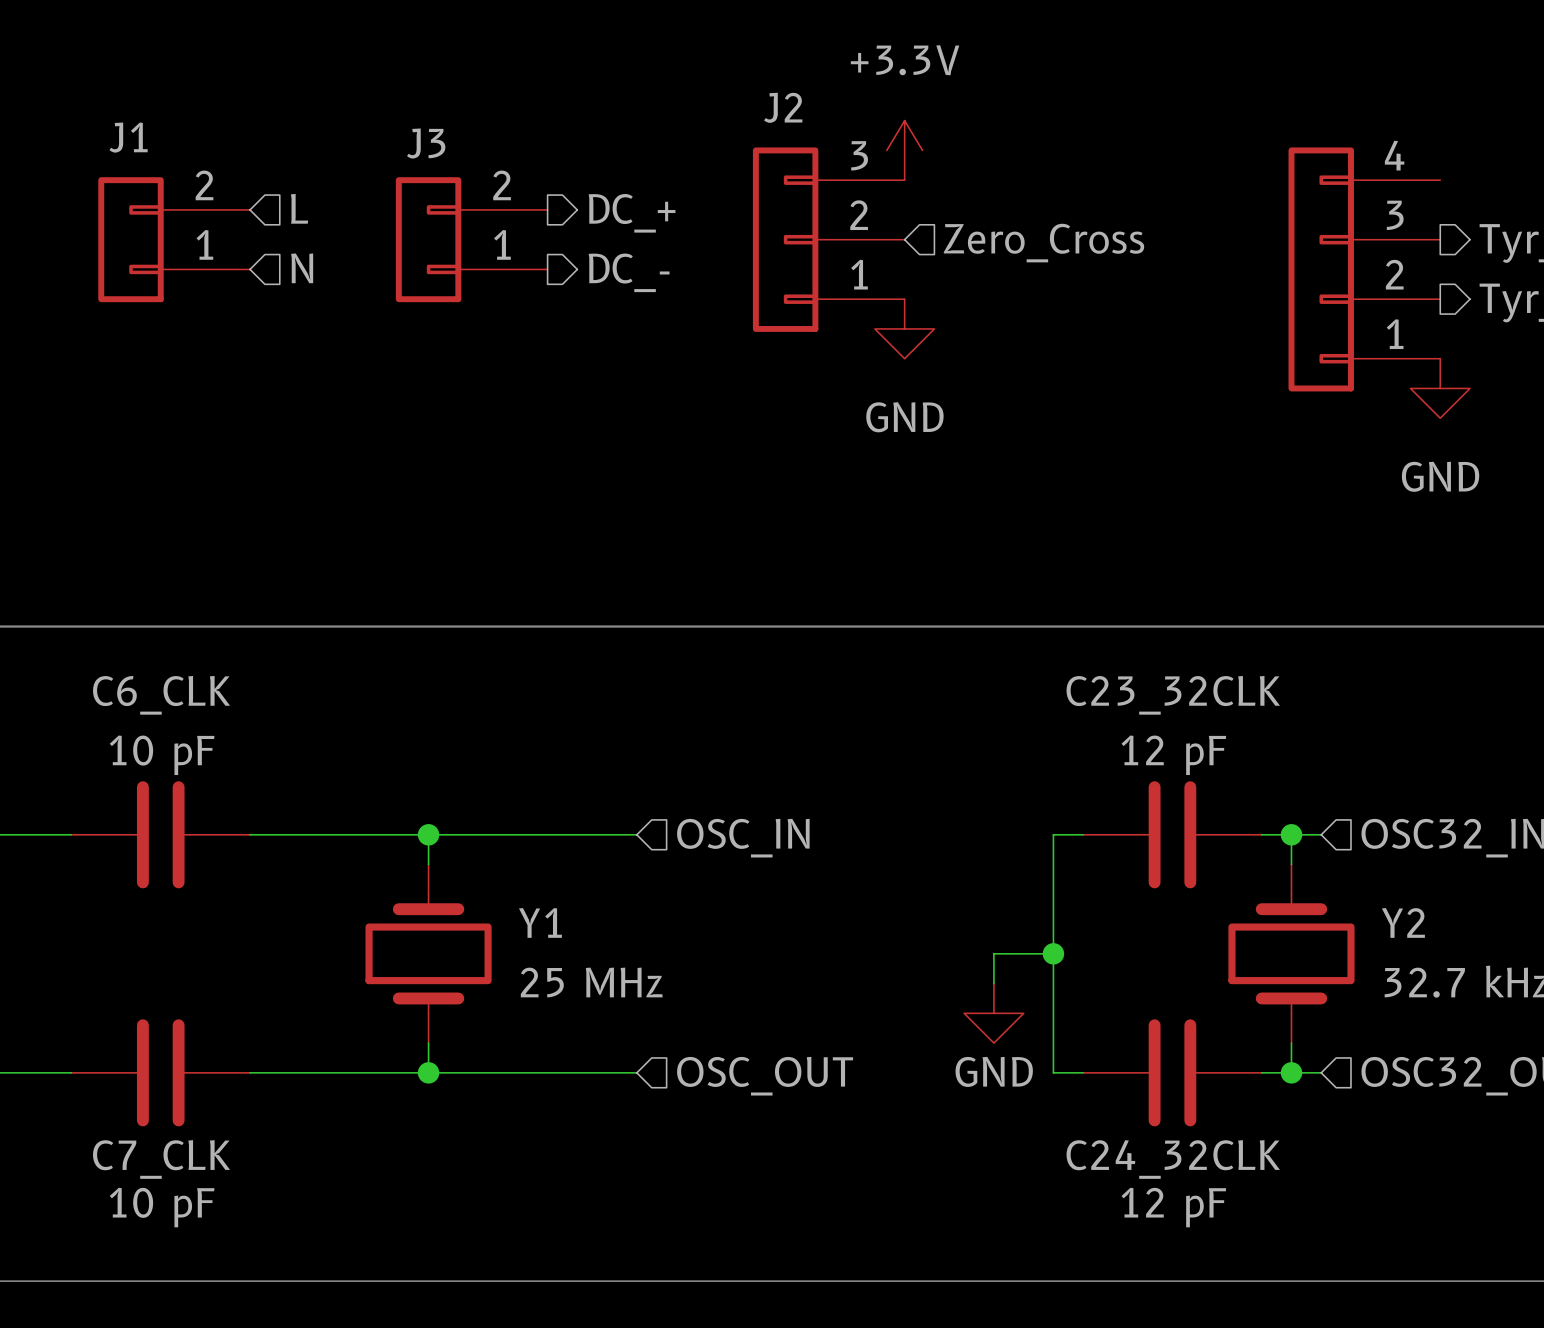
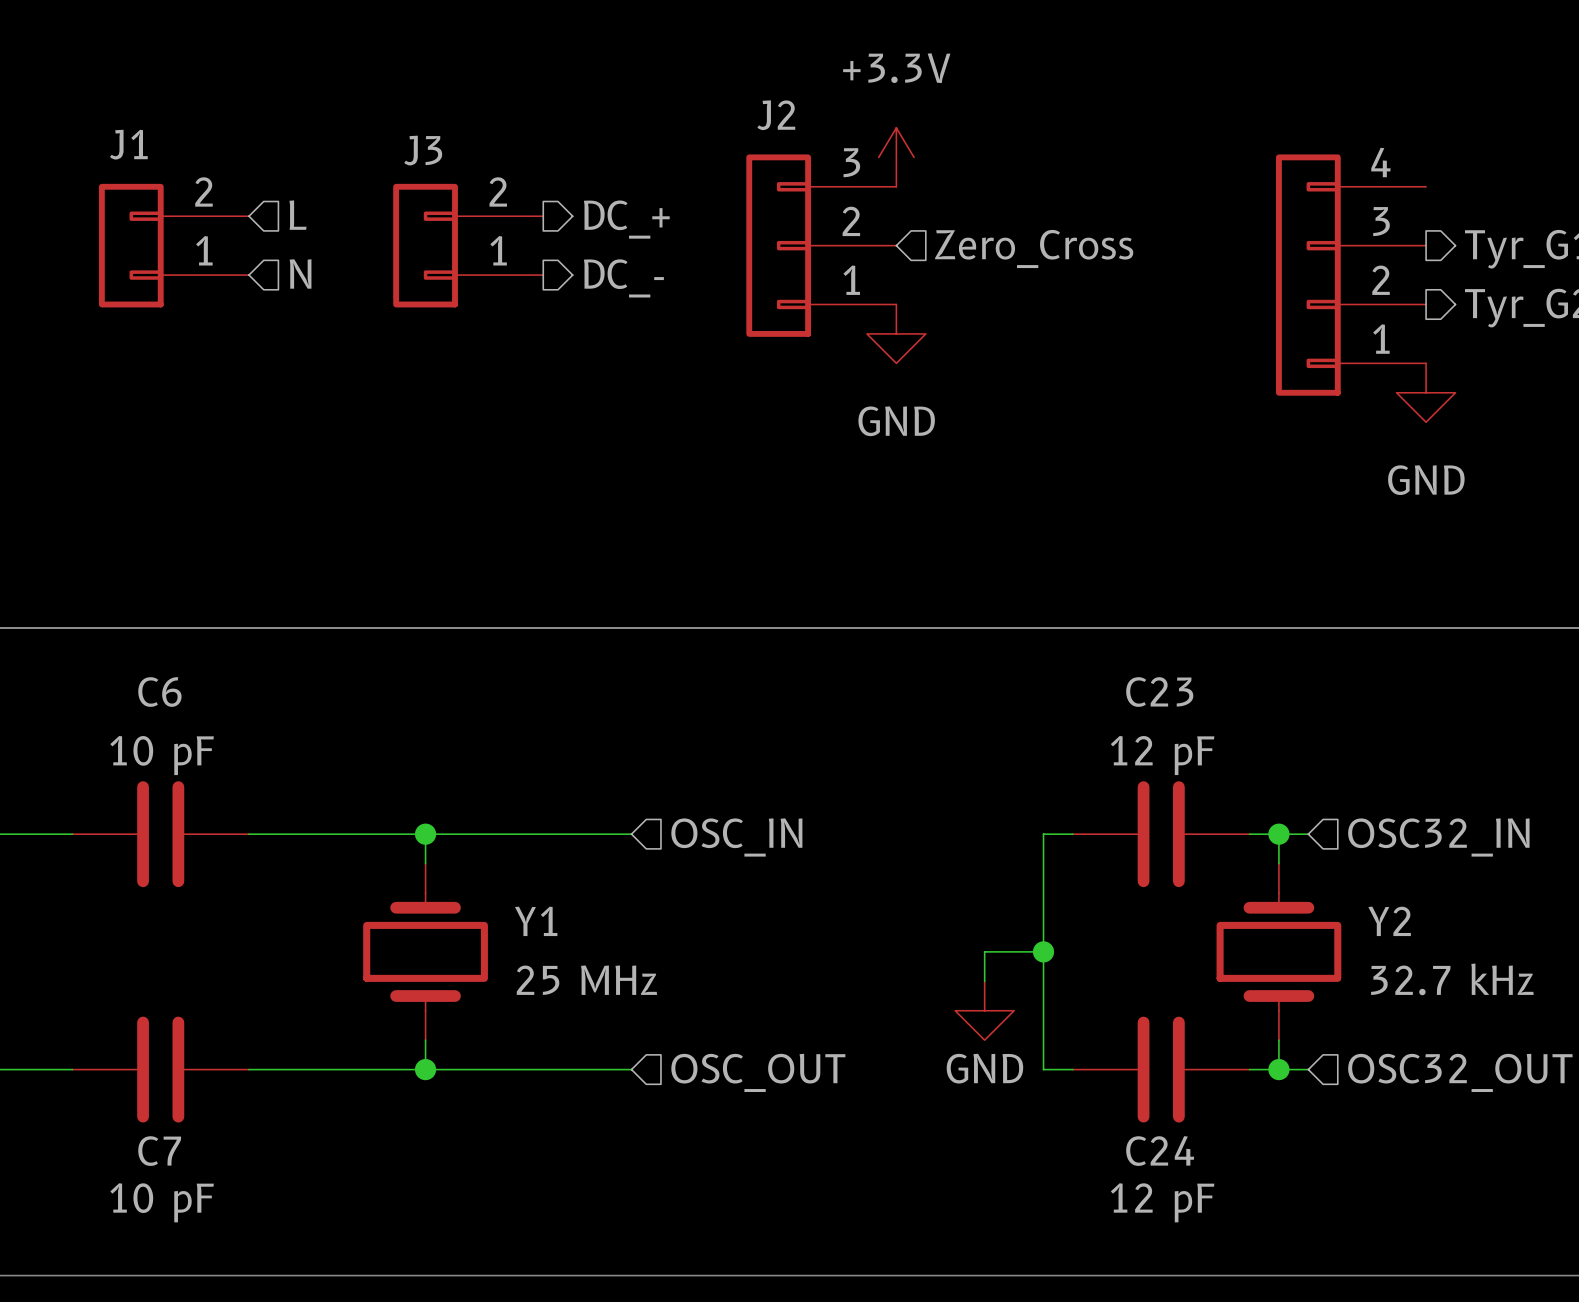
C6_CLK name: C6_CLK (161, 695) -> C6 (159, 692)
C23_32CLK name: C23_32CLK (1173, 695) -> C23 (1159, 692)
C7_CLK name: C7_CLK (161, 1159) -> C7 (159, 1151)
C24_32CLK name: C24_32CLK (1173, 1159) -> C24 (1160, 1151)

